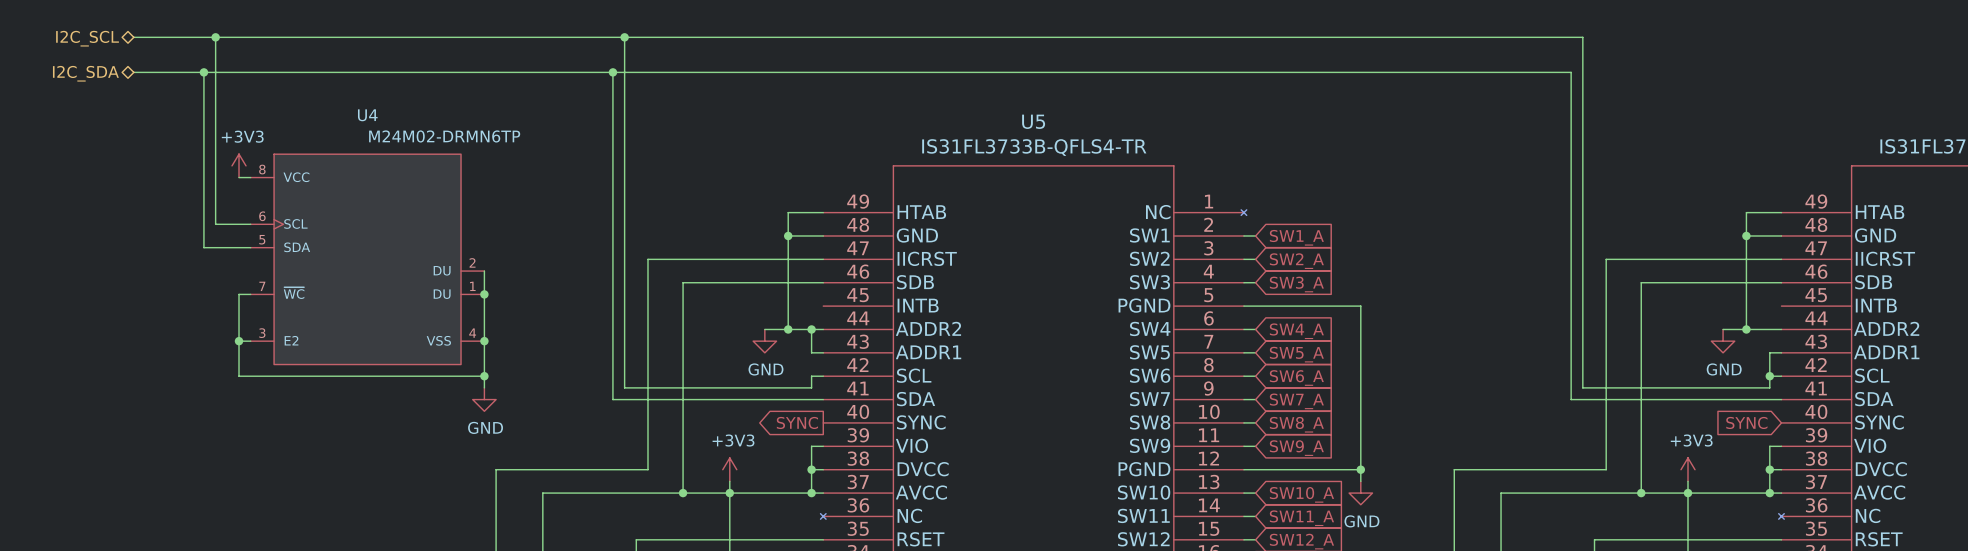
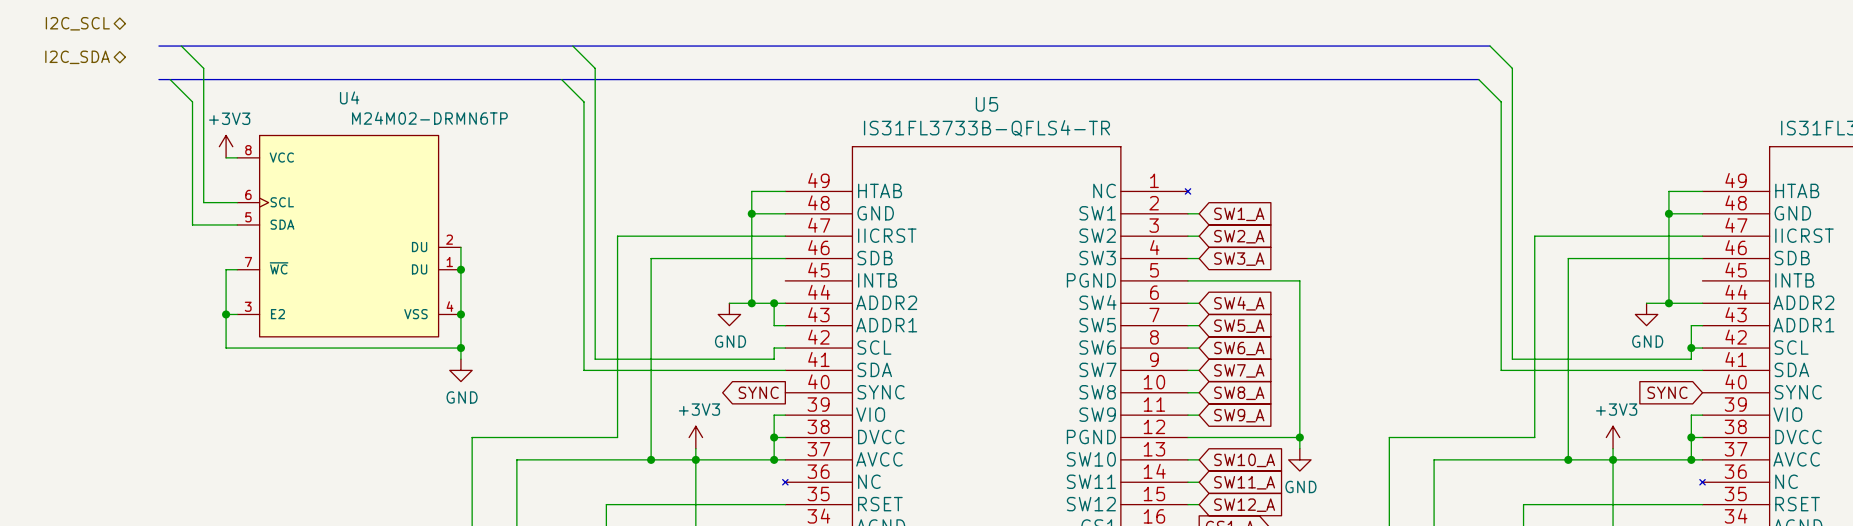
wire: (133, 37) (1582, 37) (1582, 84) -> (1489, 46) (1512, 68)
wire: (215, 37) (215, 84) -> (181, 46) (203, 68)
junction: (215, 37) -> none
wire: (624, 37) (624, 84) -> (572, 46) (595, 68)
junction: (624, 37) -> none
bus: none -> (158, 46) (1489, 46)
wire: (133, 72) (1571, 72) (1571, 119) -> (1478, 79) (1501, 101)
wire: (203, 72) (203, 119) -> (170, 79) (192, 101)
junction: (203, 72) -> none
wire: (612, 72) (612, 119) -> (561, 79) (583, 101)
junction: (612, 72) -> none
bus: none -> (158, 79) (1478, 79)

